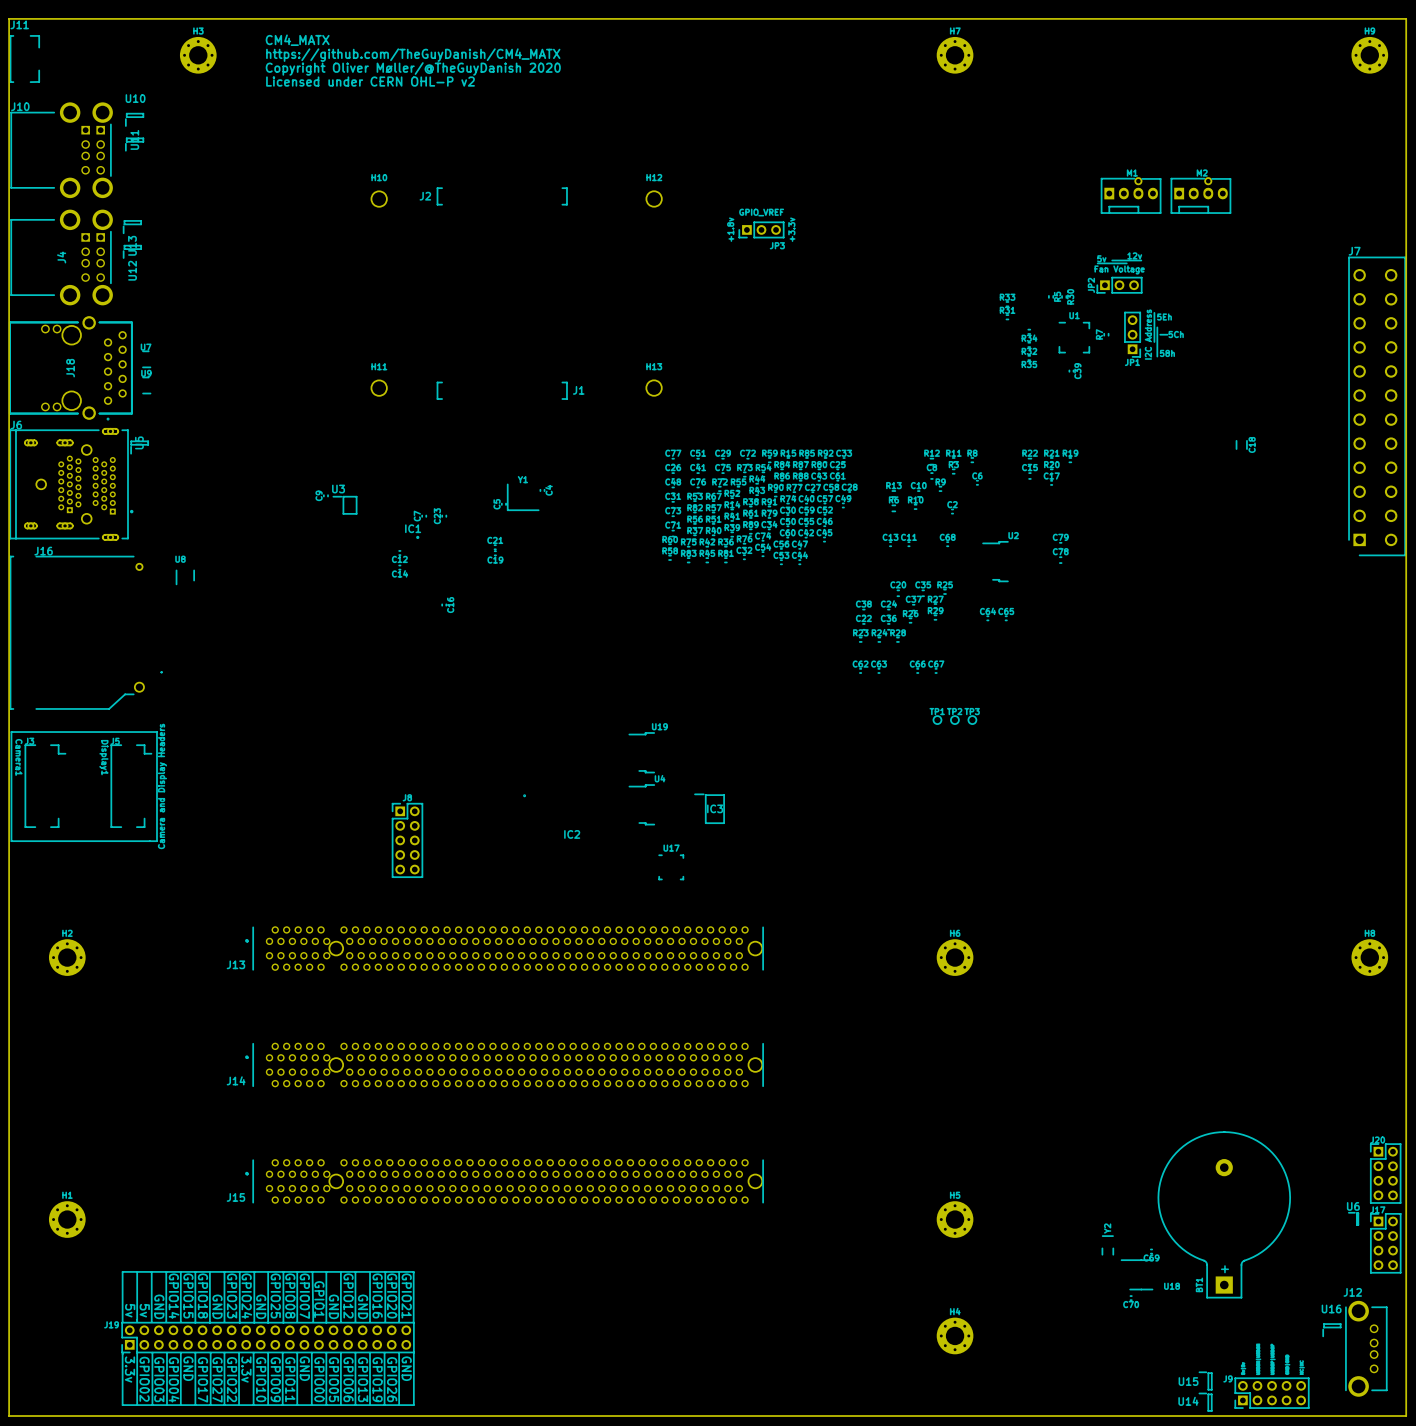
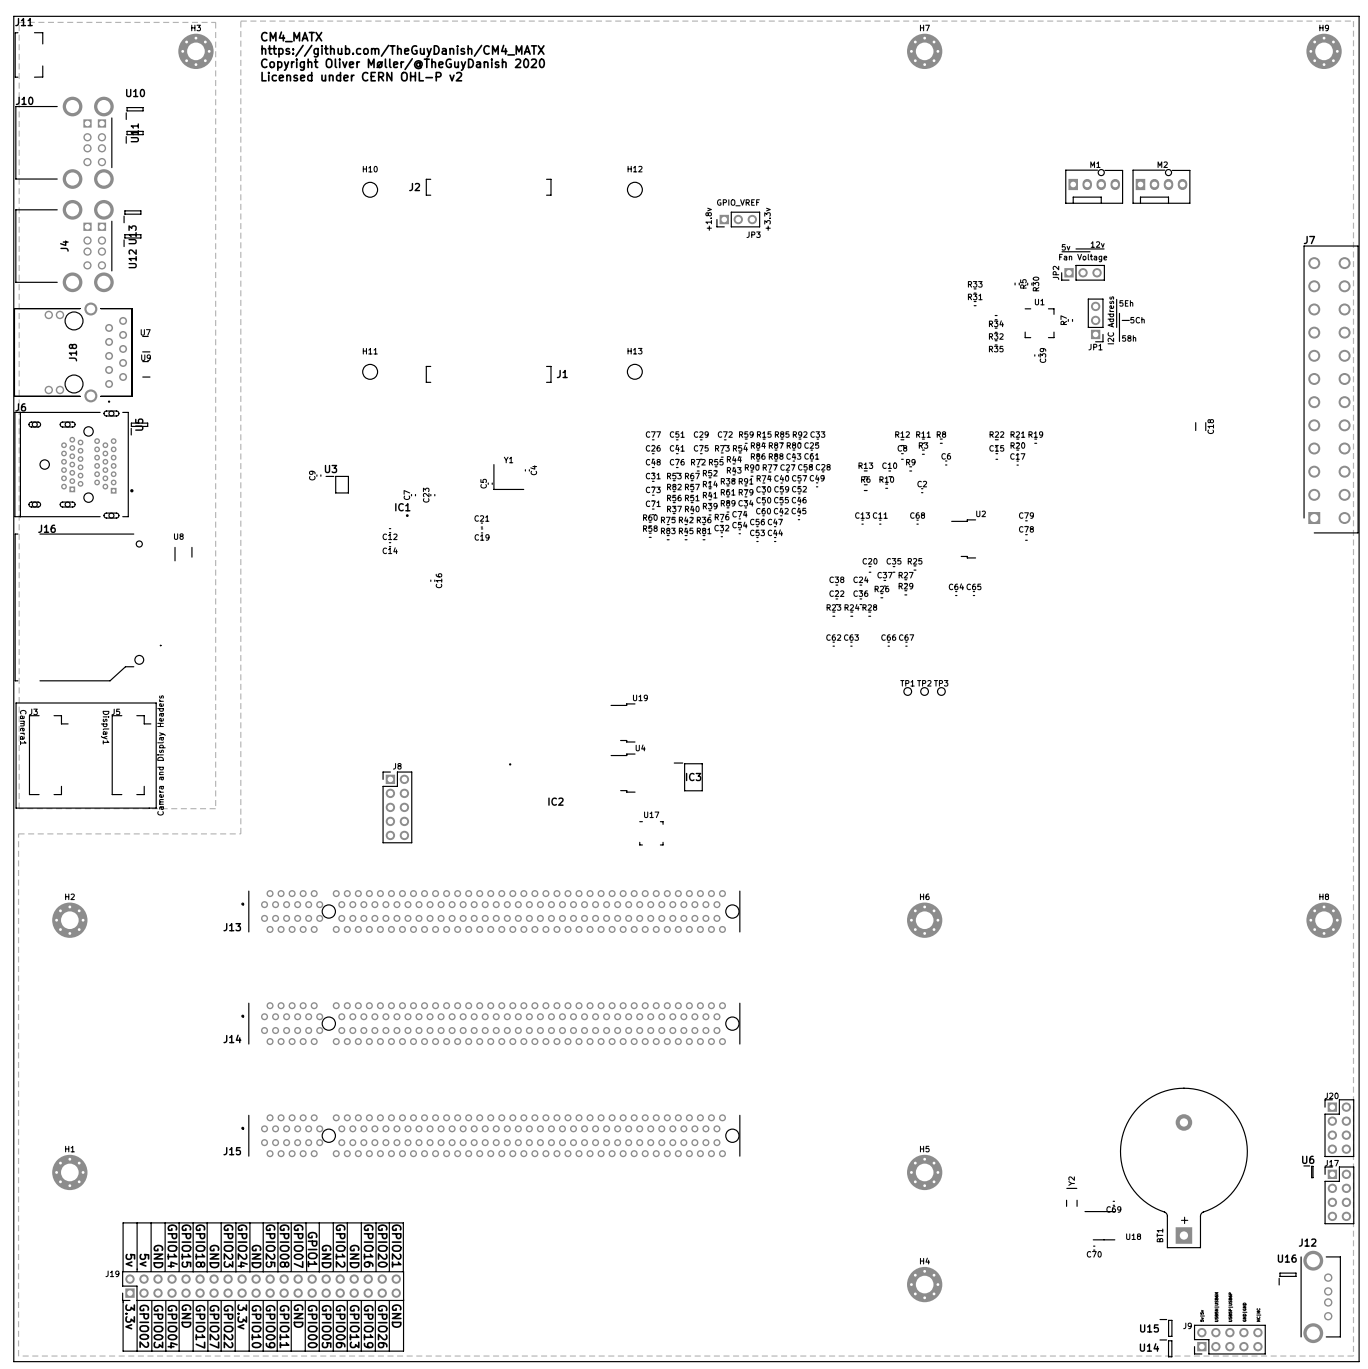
zone outline: none -> (240, 21) (240, 833) (18, 833) (18, 1356) (1353, 1356) (1353, 21) (240, 21)
zone outline: none -> (19, 22) (19, 808) (215, 808) (215, 22) (19, 22)

